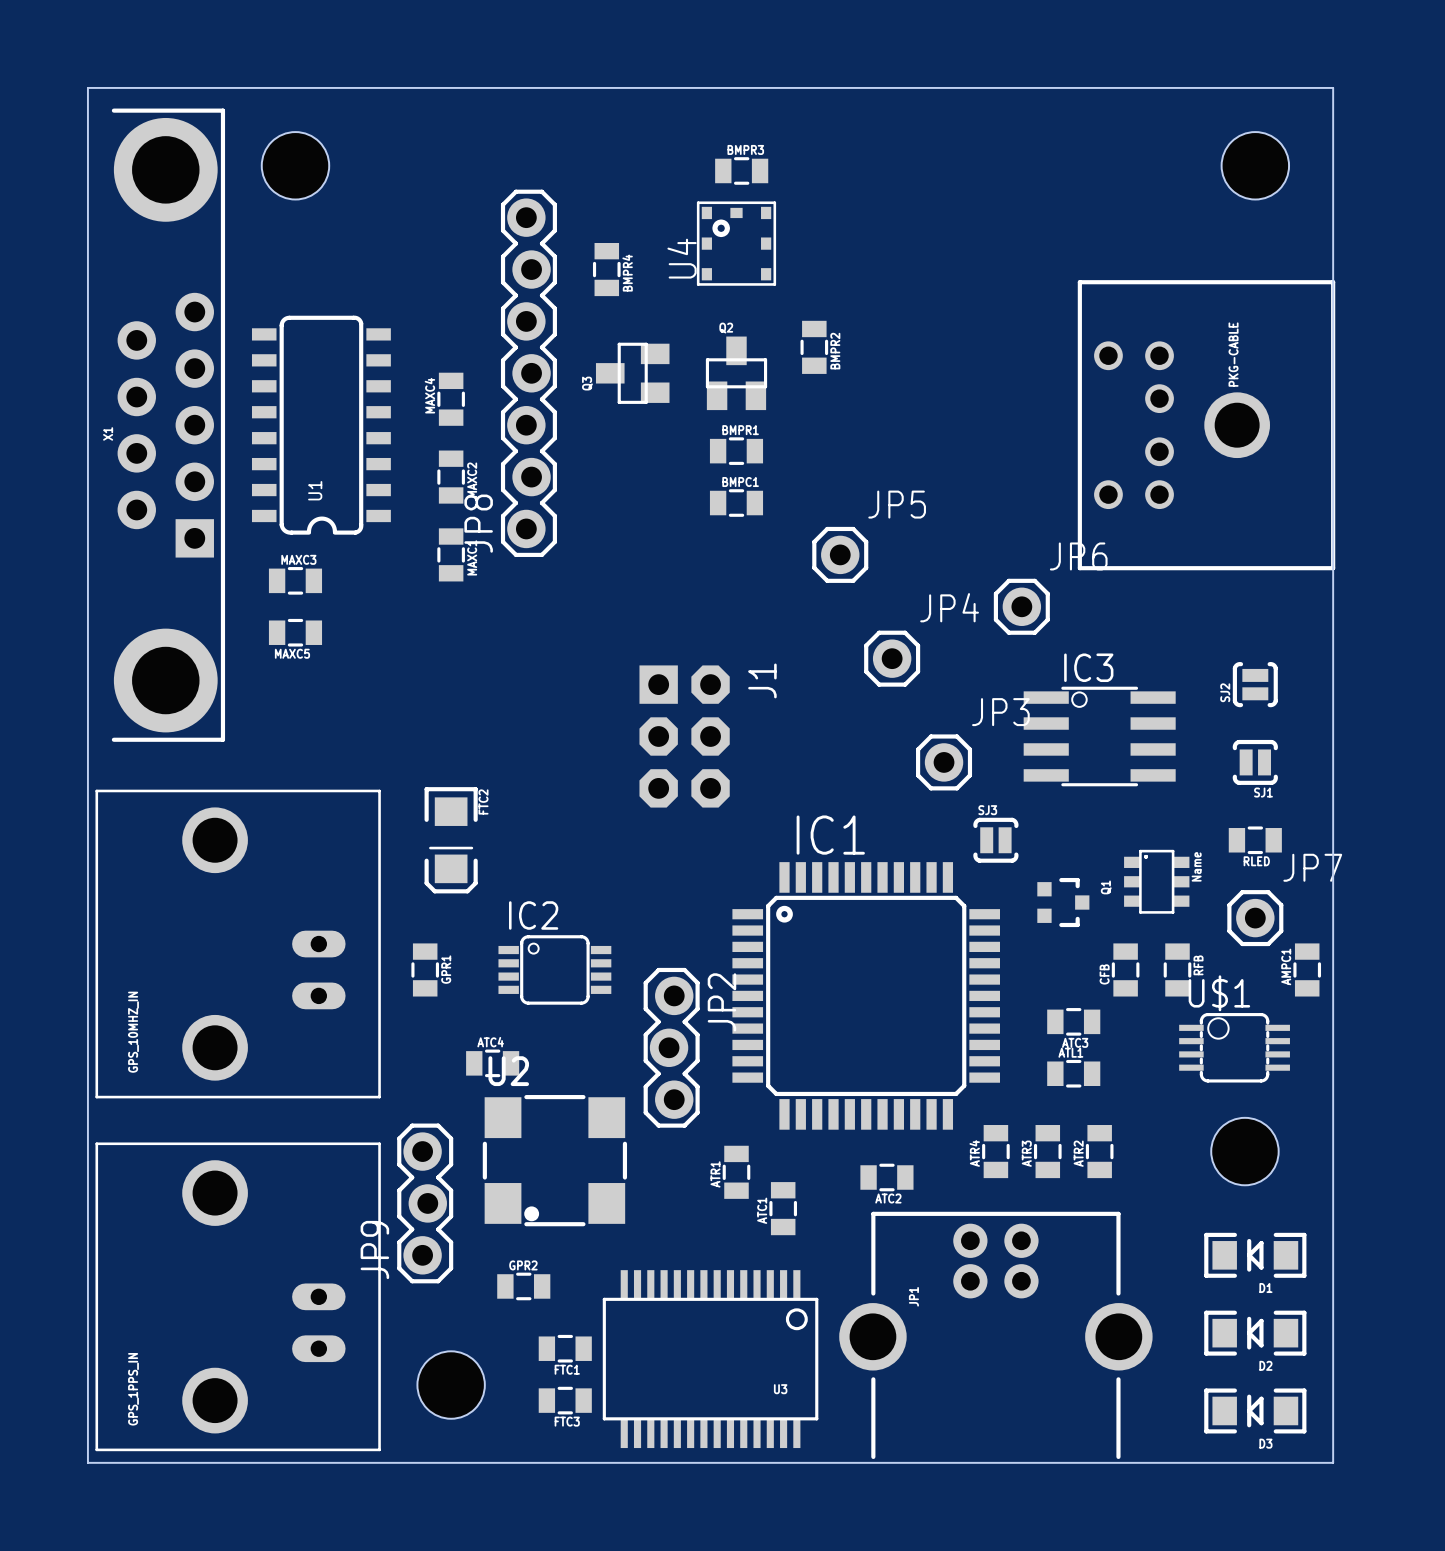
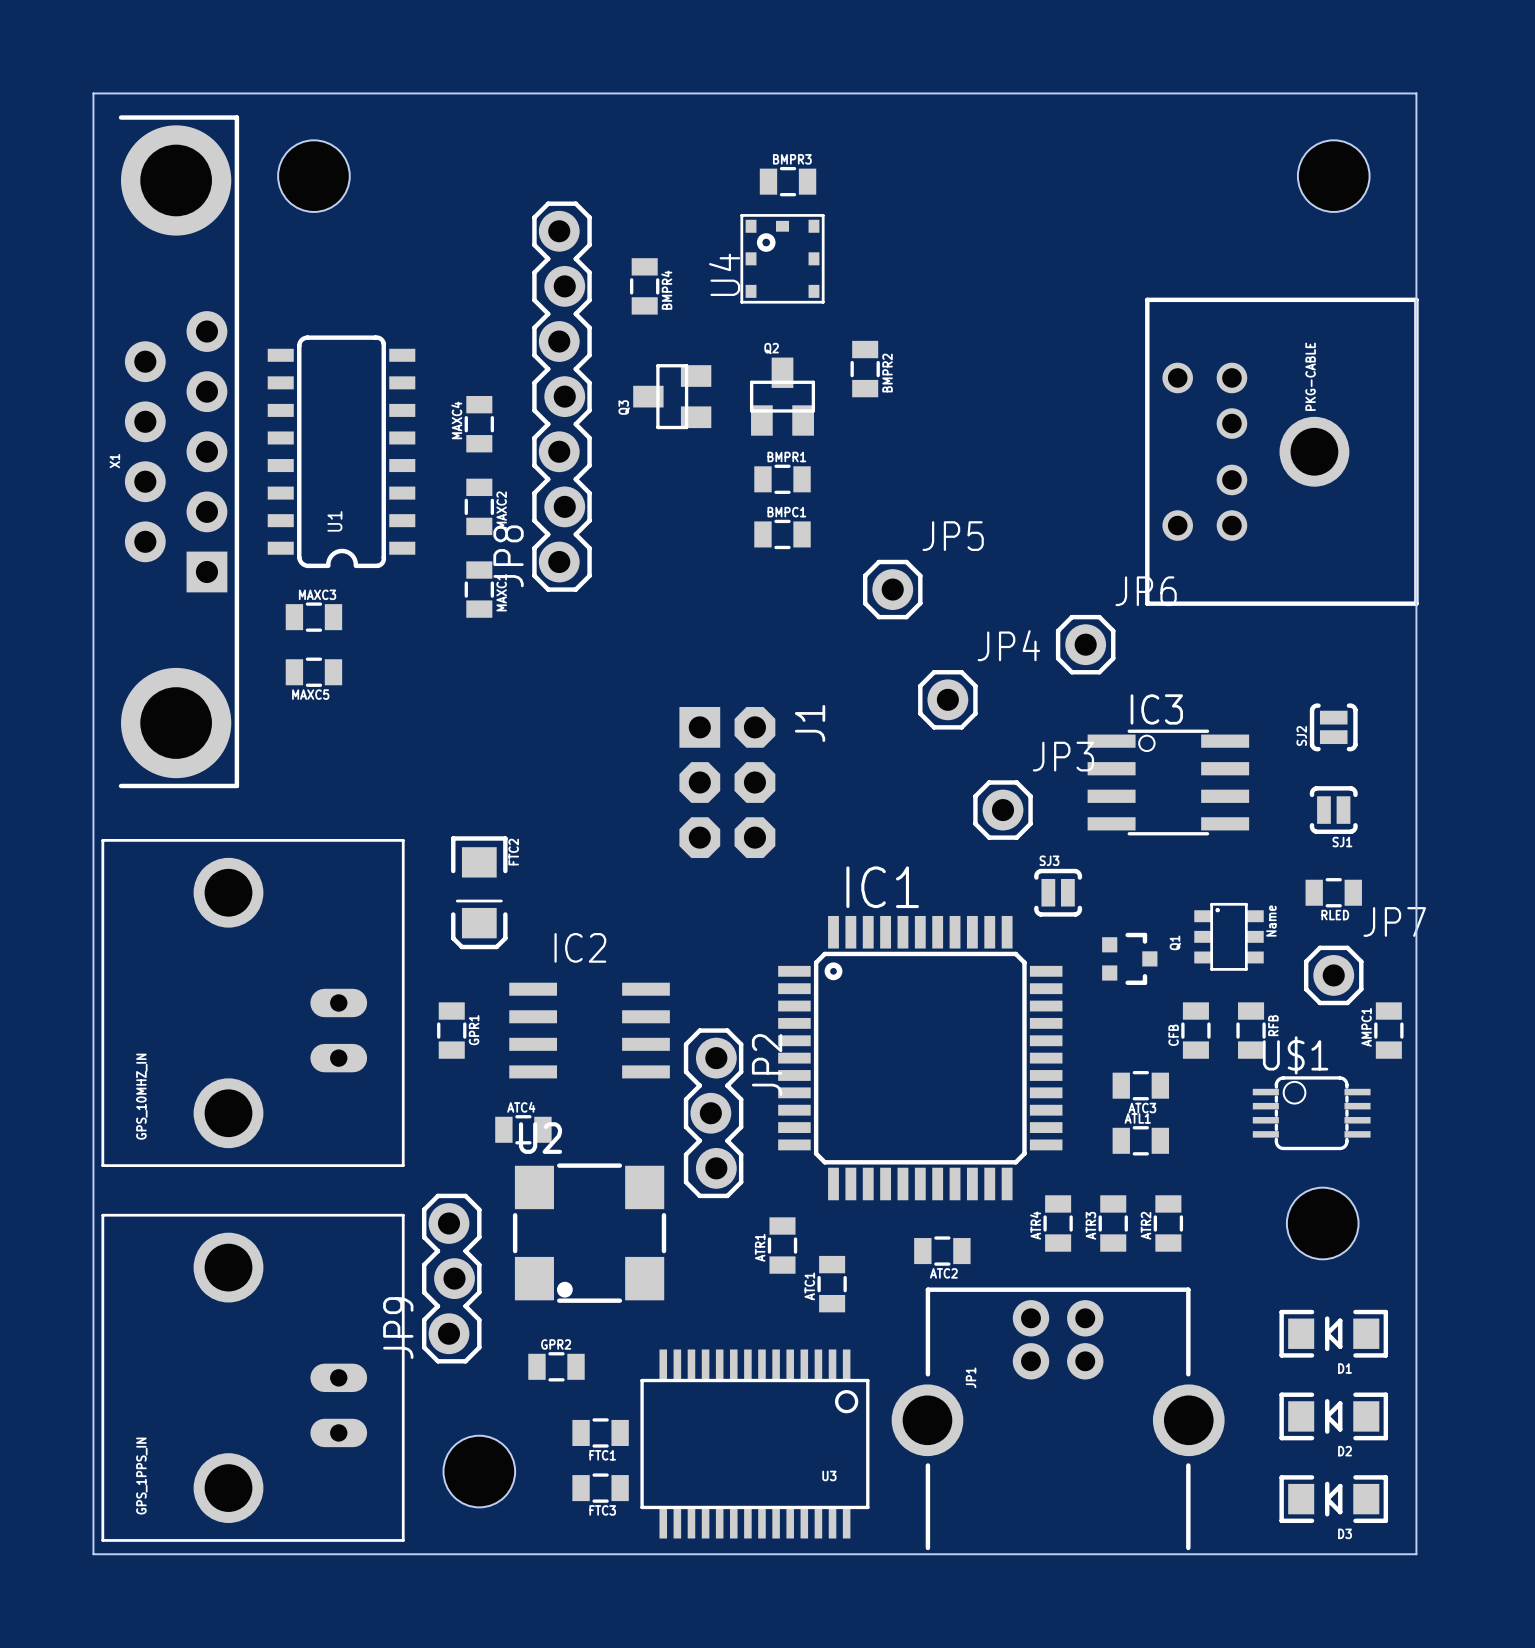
IC2 footprint: [498, 935, 612, 1005] -> [509, 982, 670, 1079]

